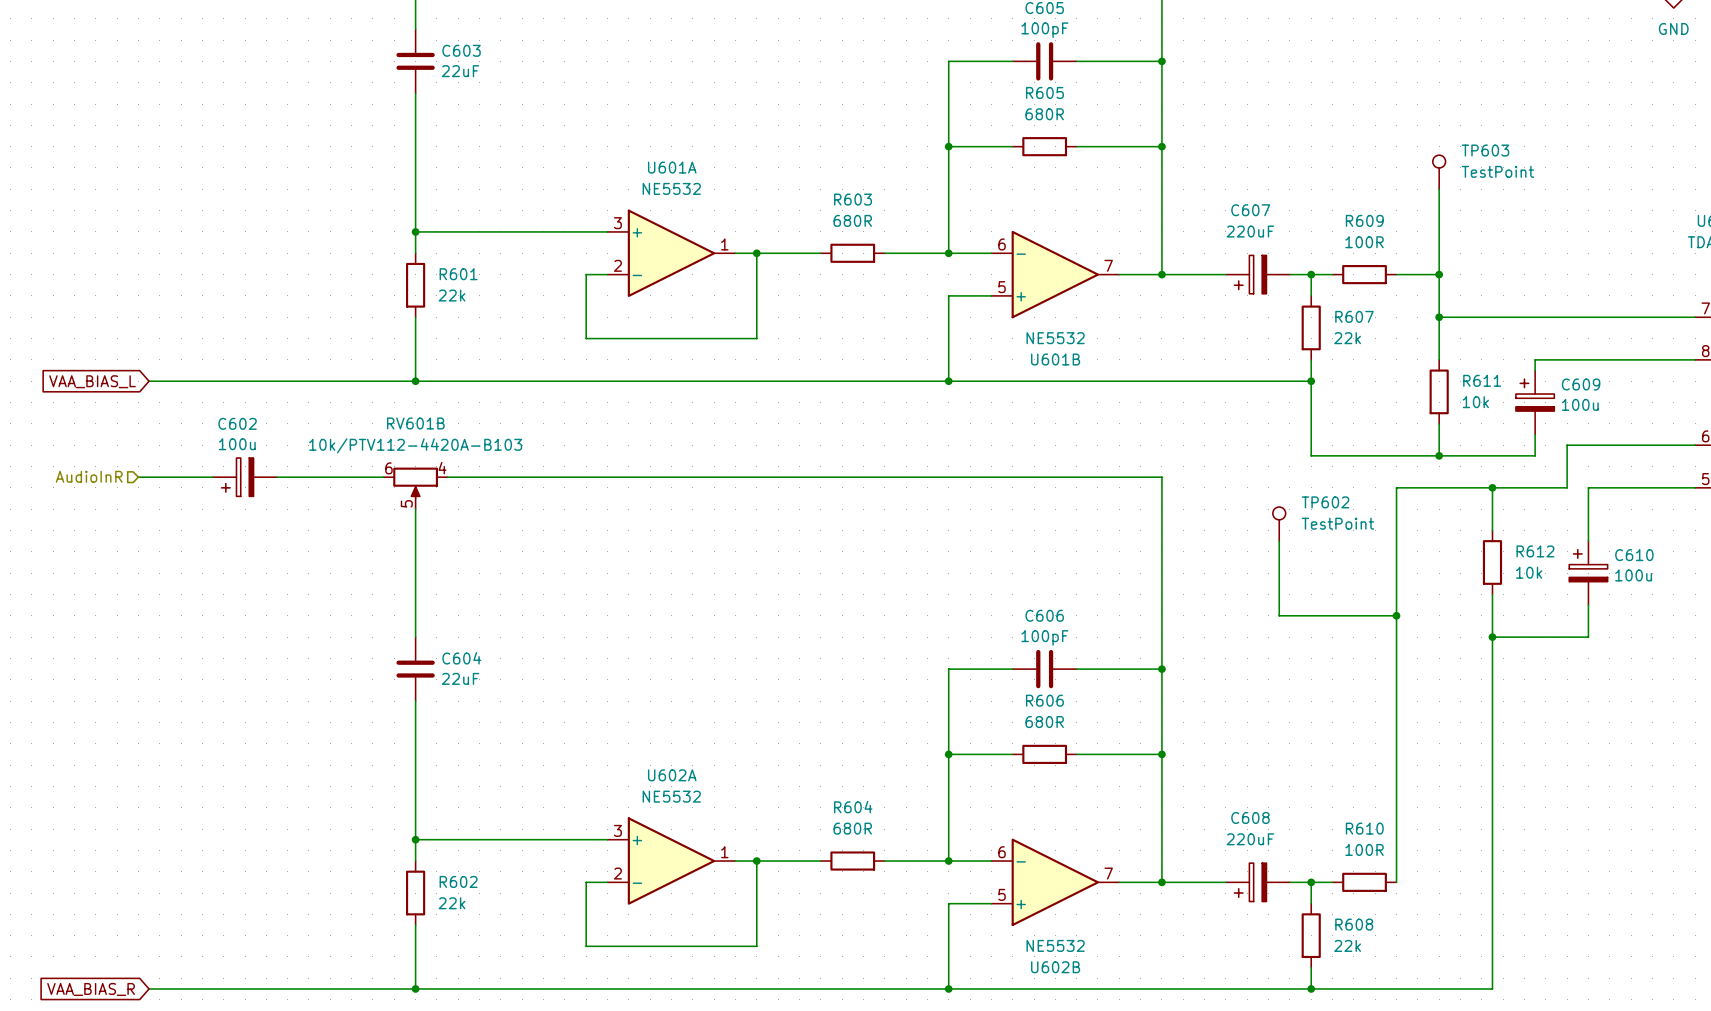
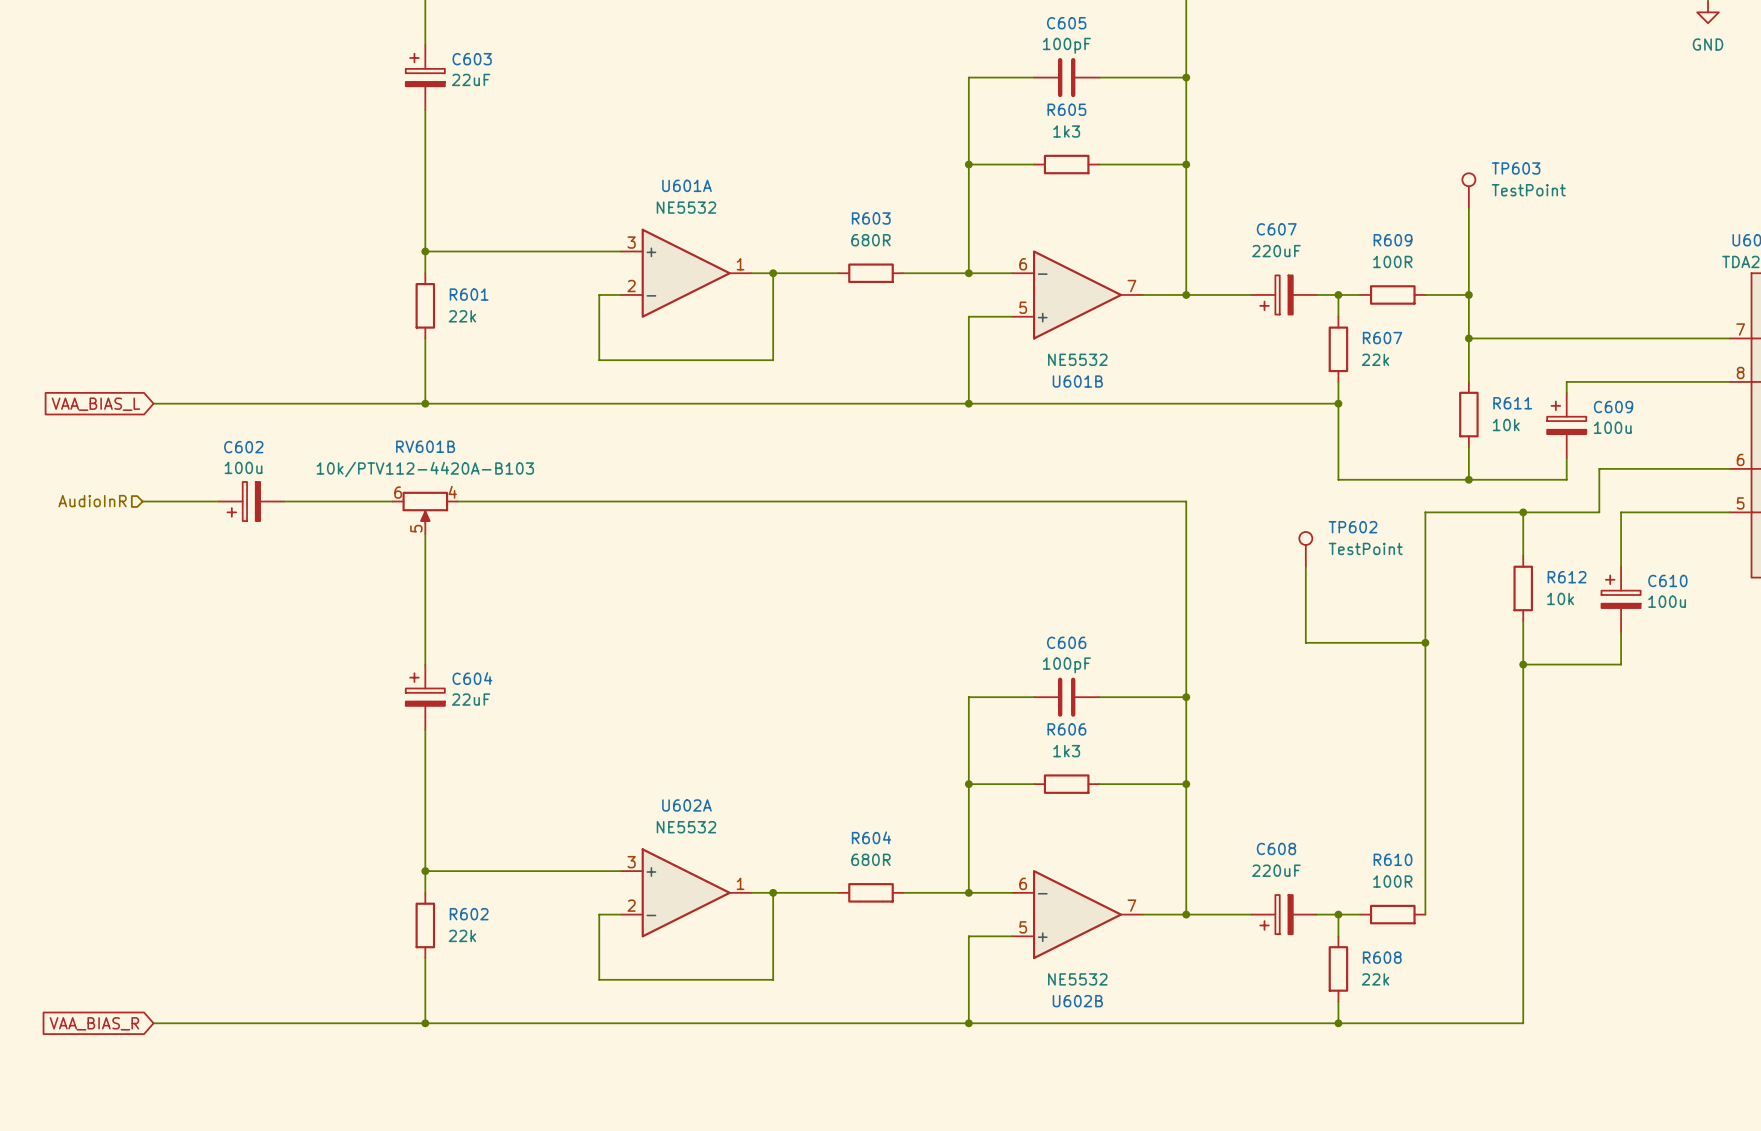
C603 symbol: [396, 29, 435, 94] -> [405, 44, 445, 111]
R605 value: 680R (1044, 114) -> 1k3 (1066, 131)
C604 symbol: [396, 637, 435, 702] -> [405, 664, 445, 730]
R606 value: 680R (1044, 722) -> 1k3 (1066, 751)

